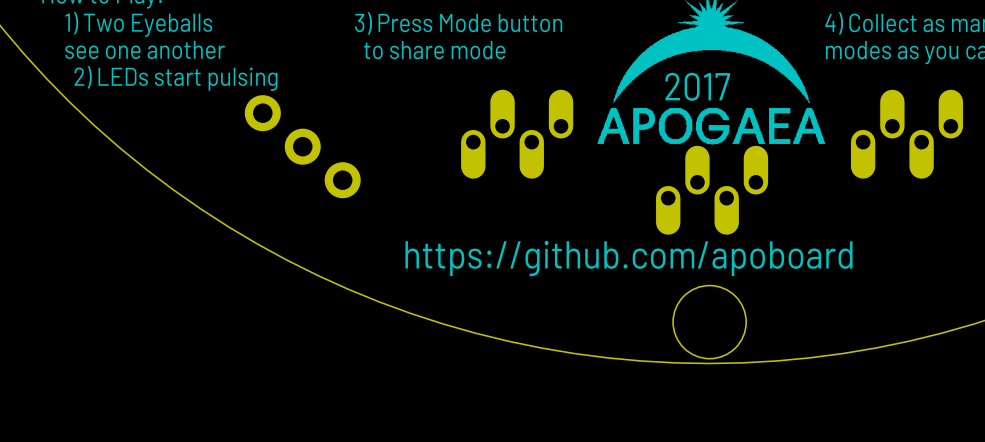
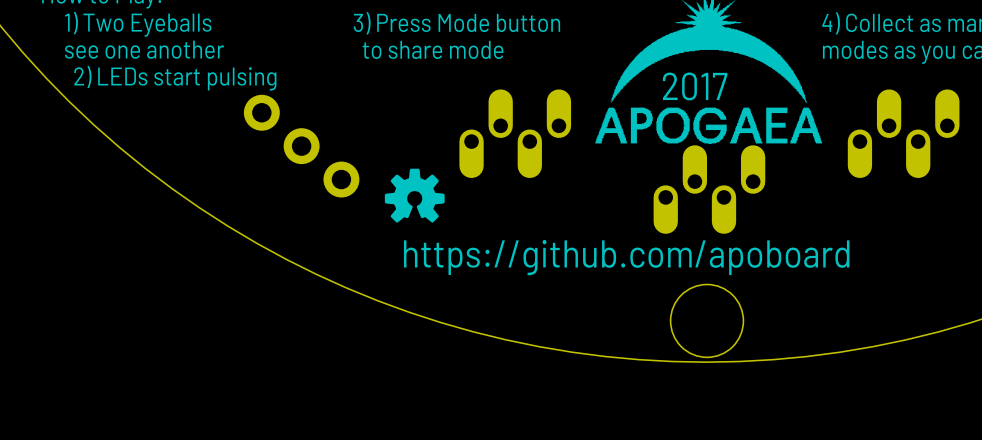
drawing: none -> [384, 168, 445, 223]

